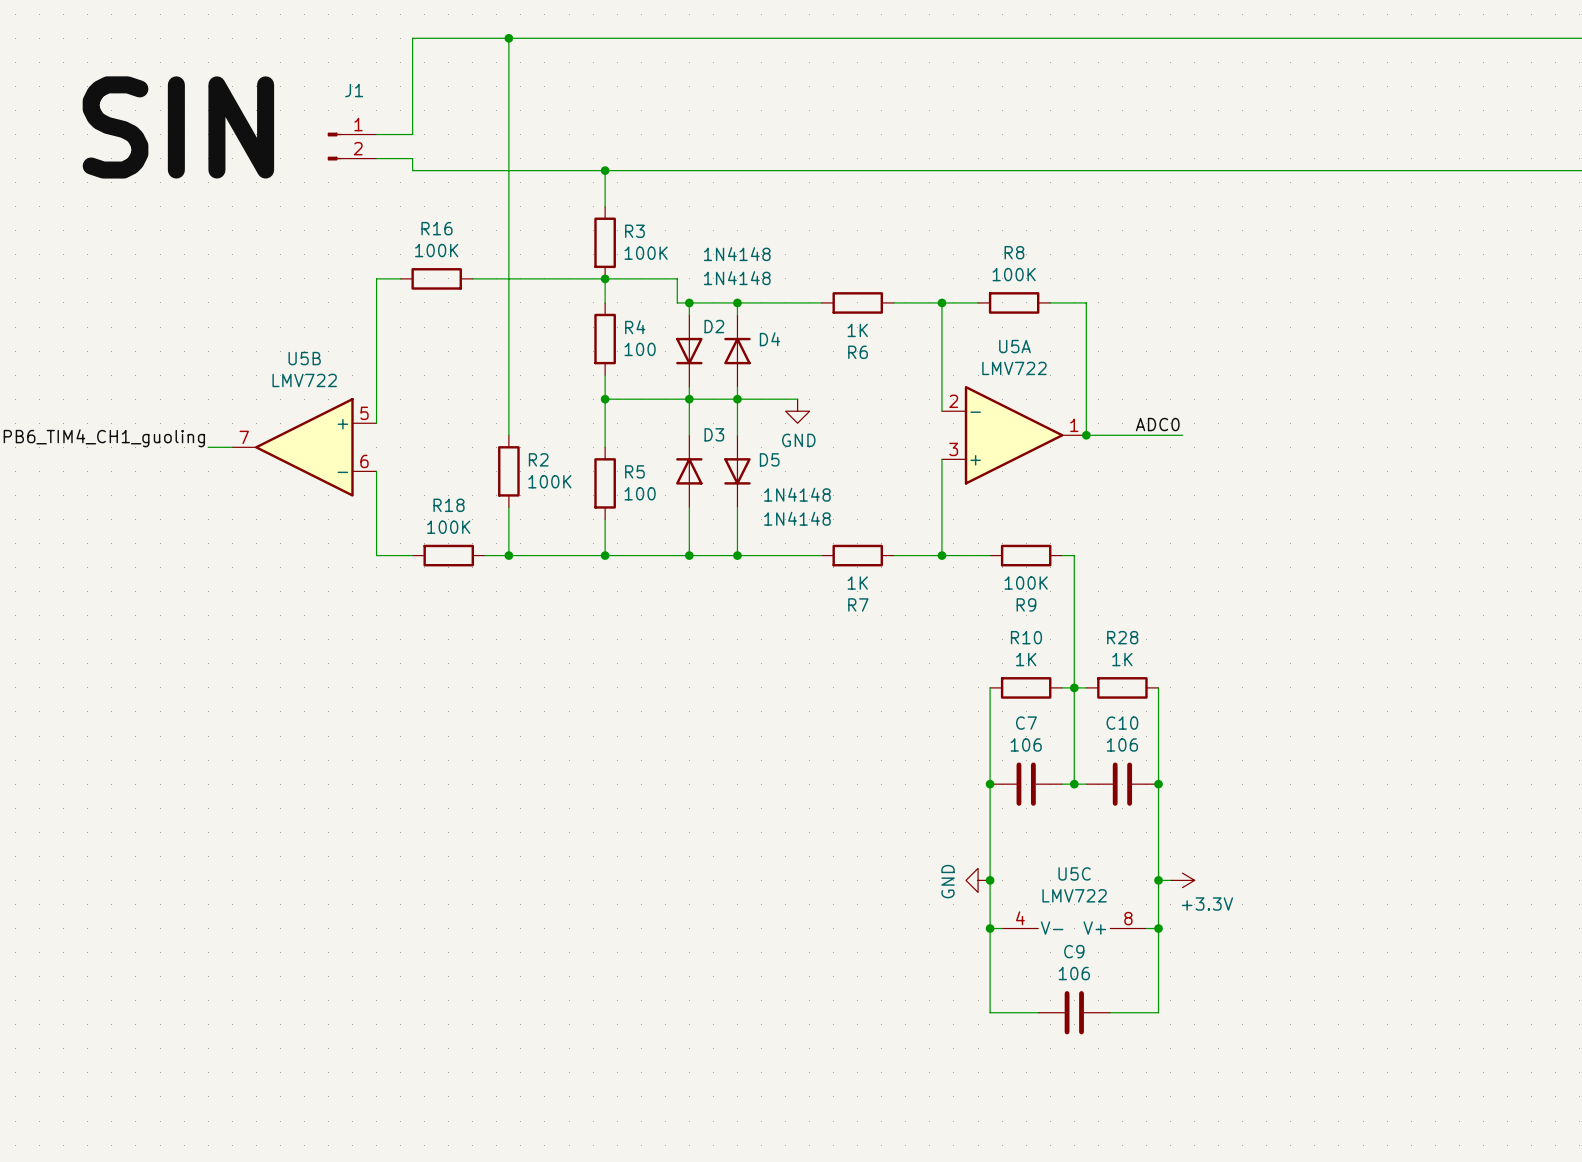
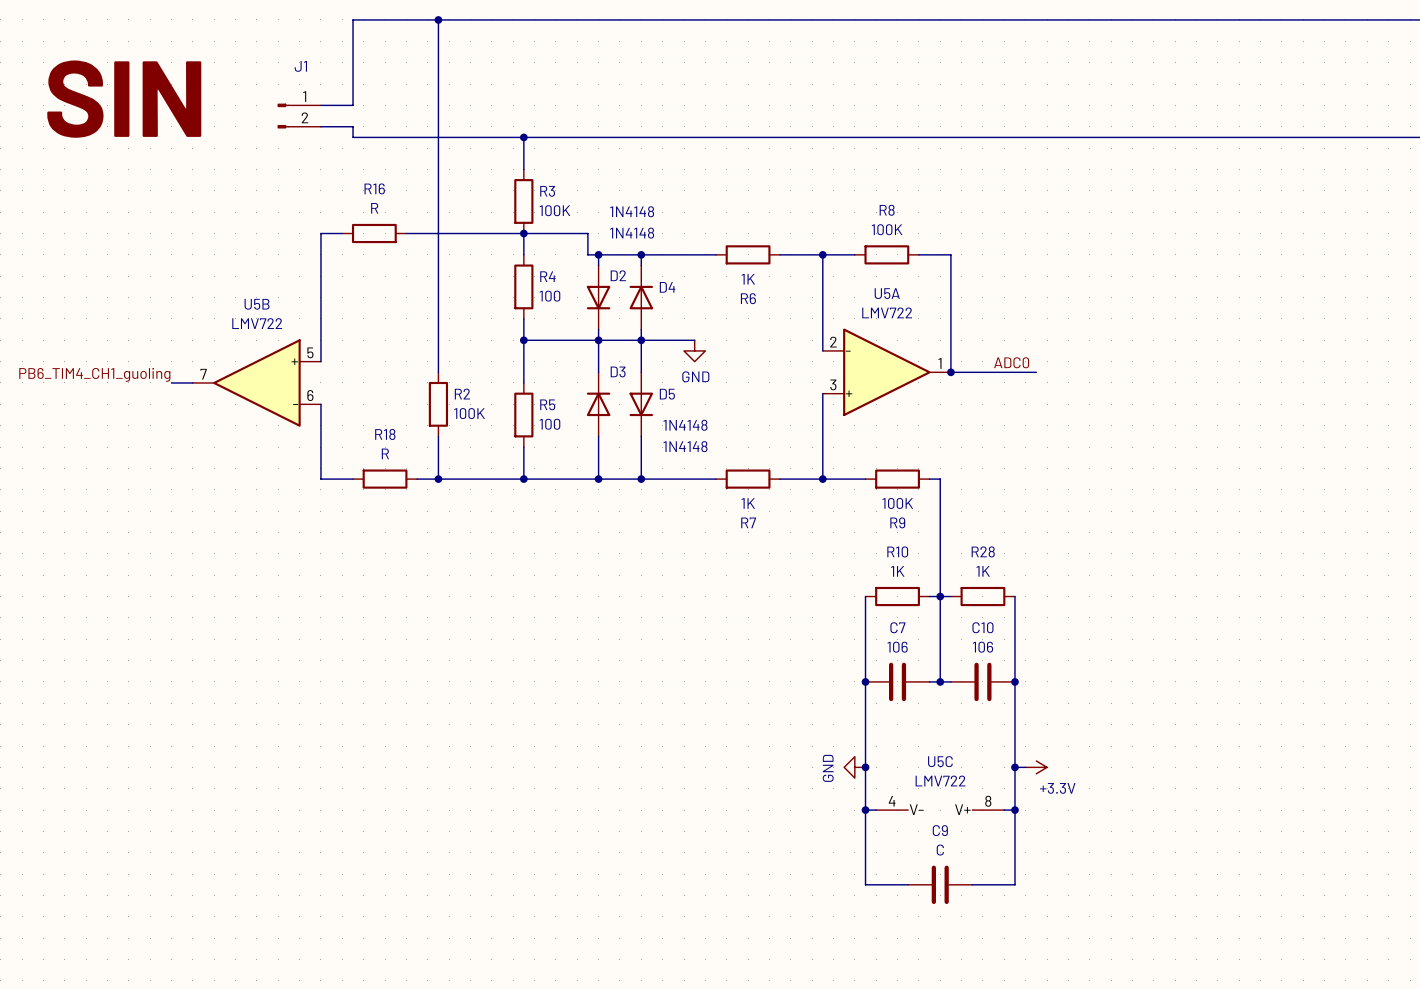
R16 value: 100K (436, 250) -> R (374, 208)
R18 value: 100K (448, 527) -> R (385, 453)
C9 value: 106 (1074, 973) -> C (940, 850)

